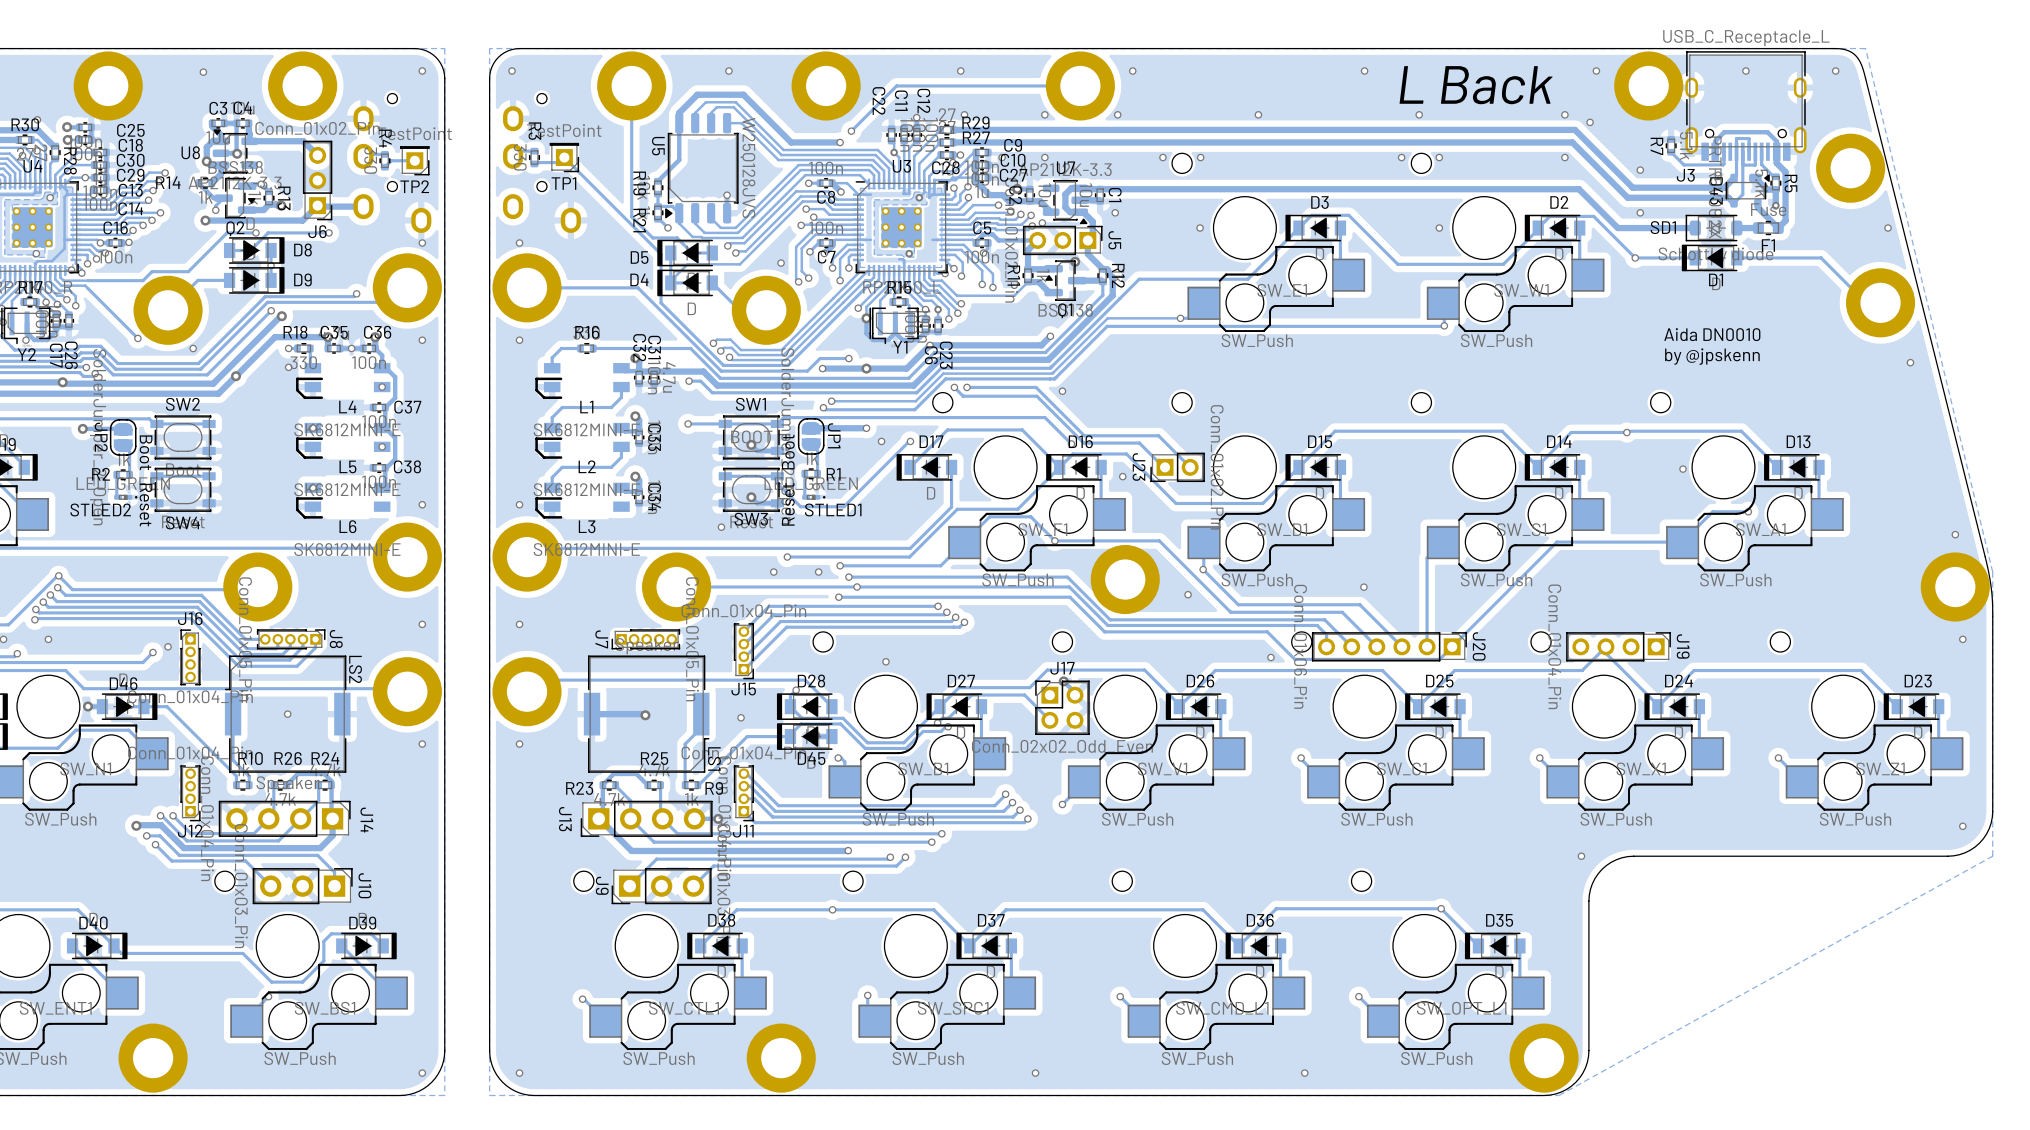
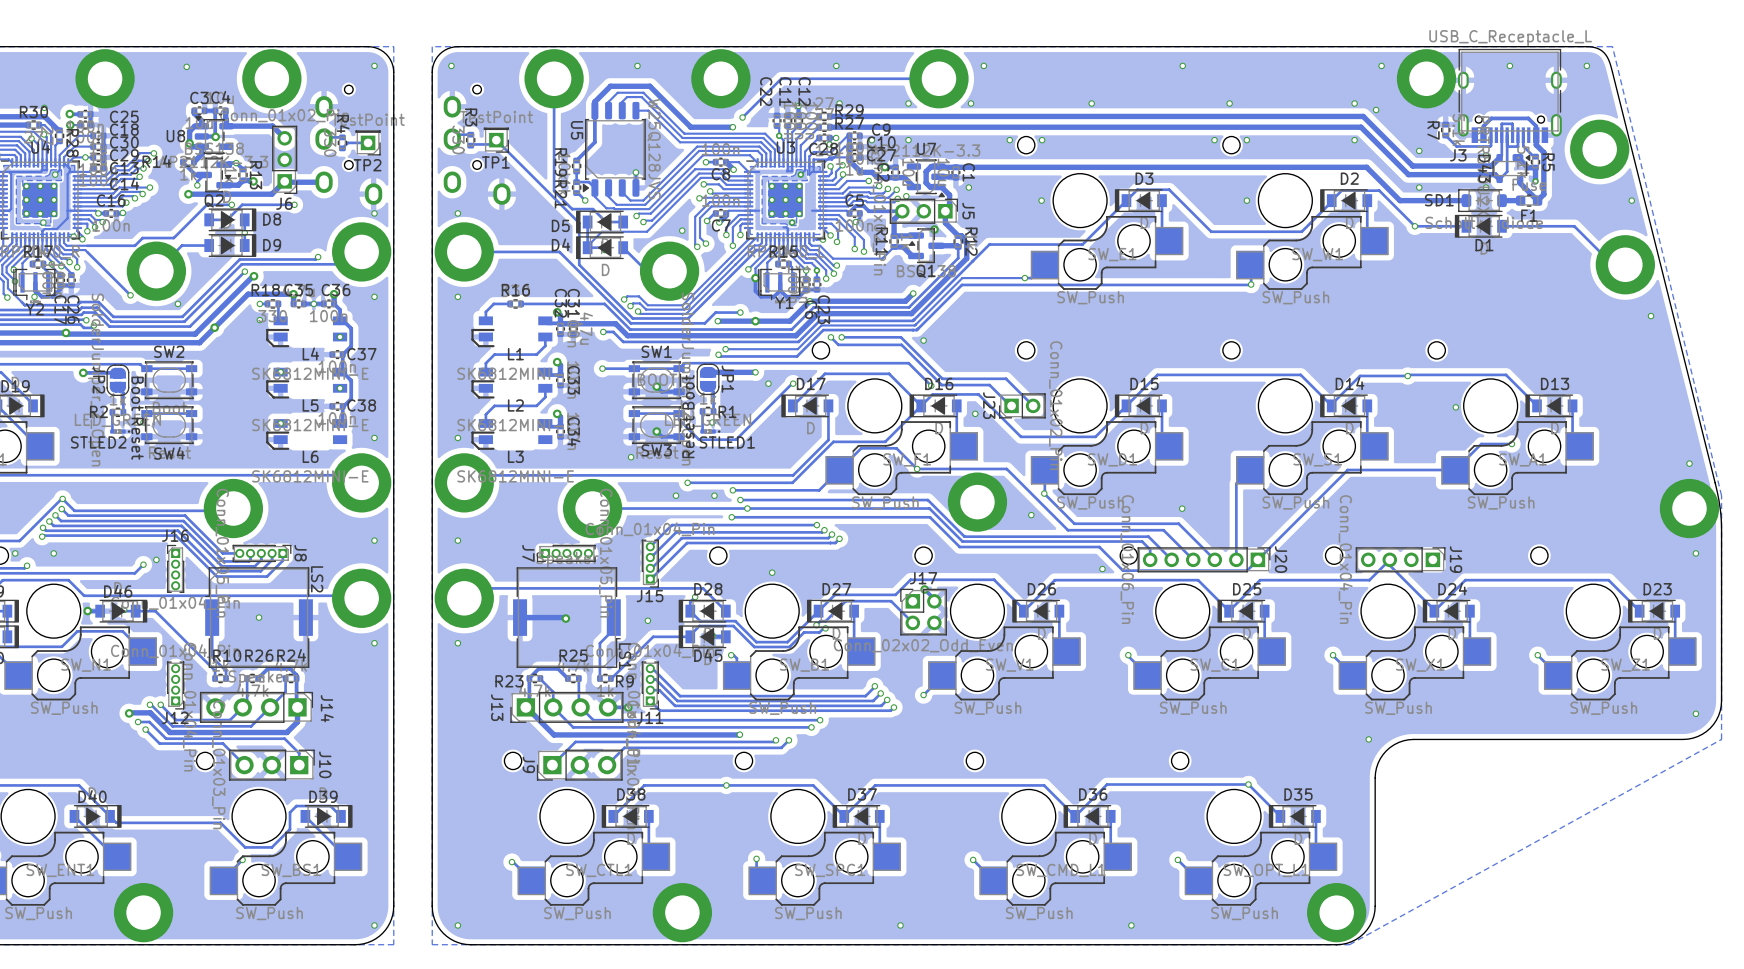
text: L Back (1476, 85) -> none
text: Aida DN0010 (1712, 334) -> none
text: by @jpskenn (1712, 356) -> none

